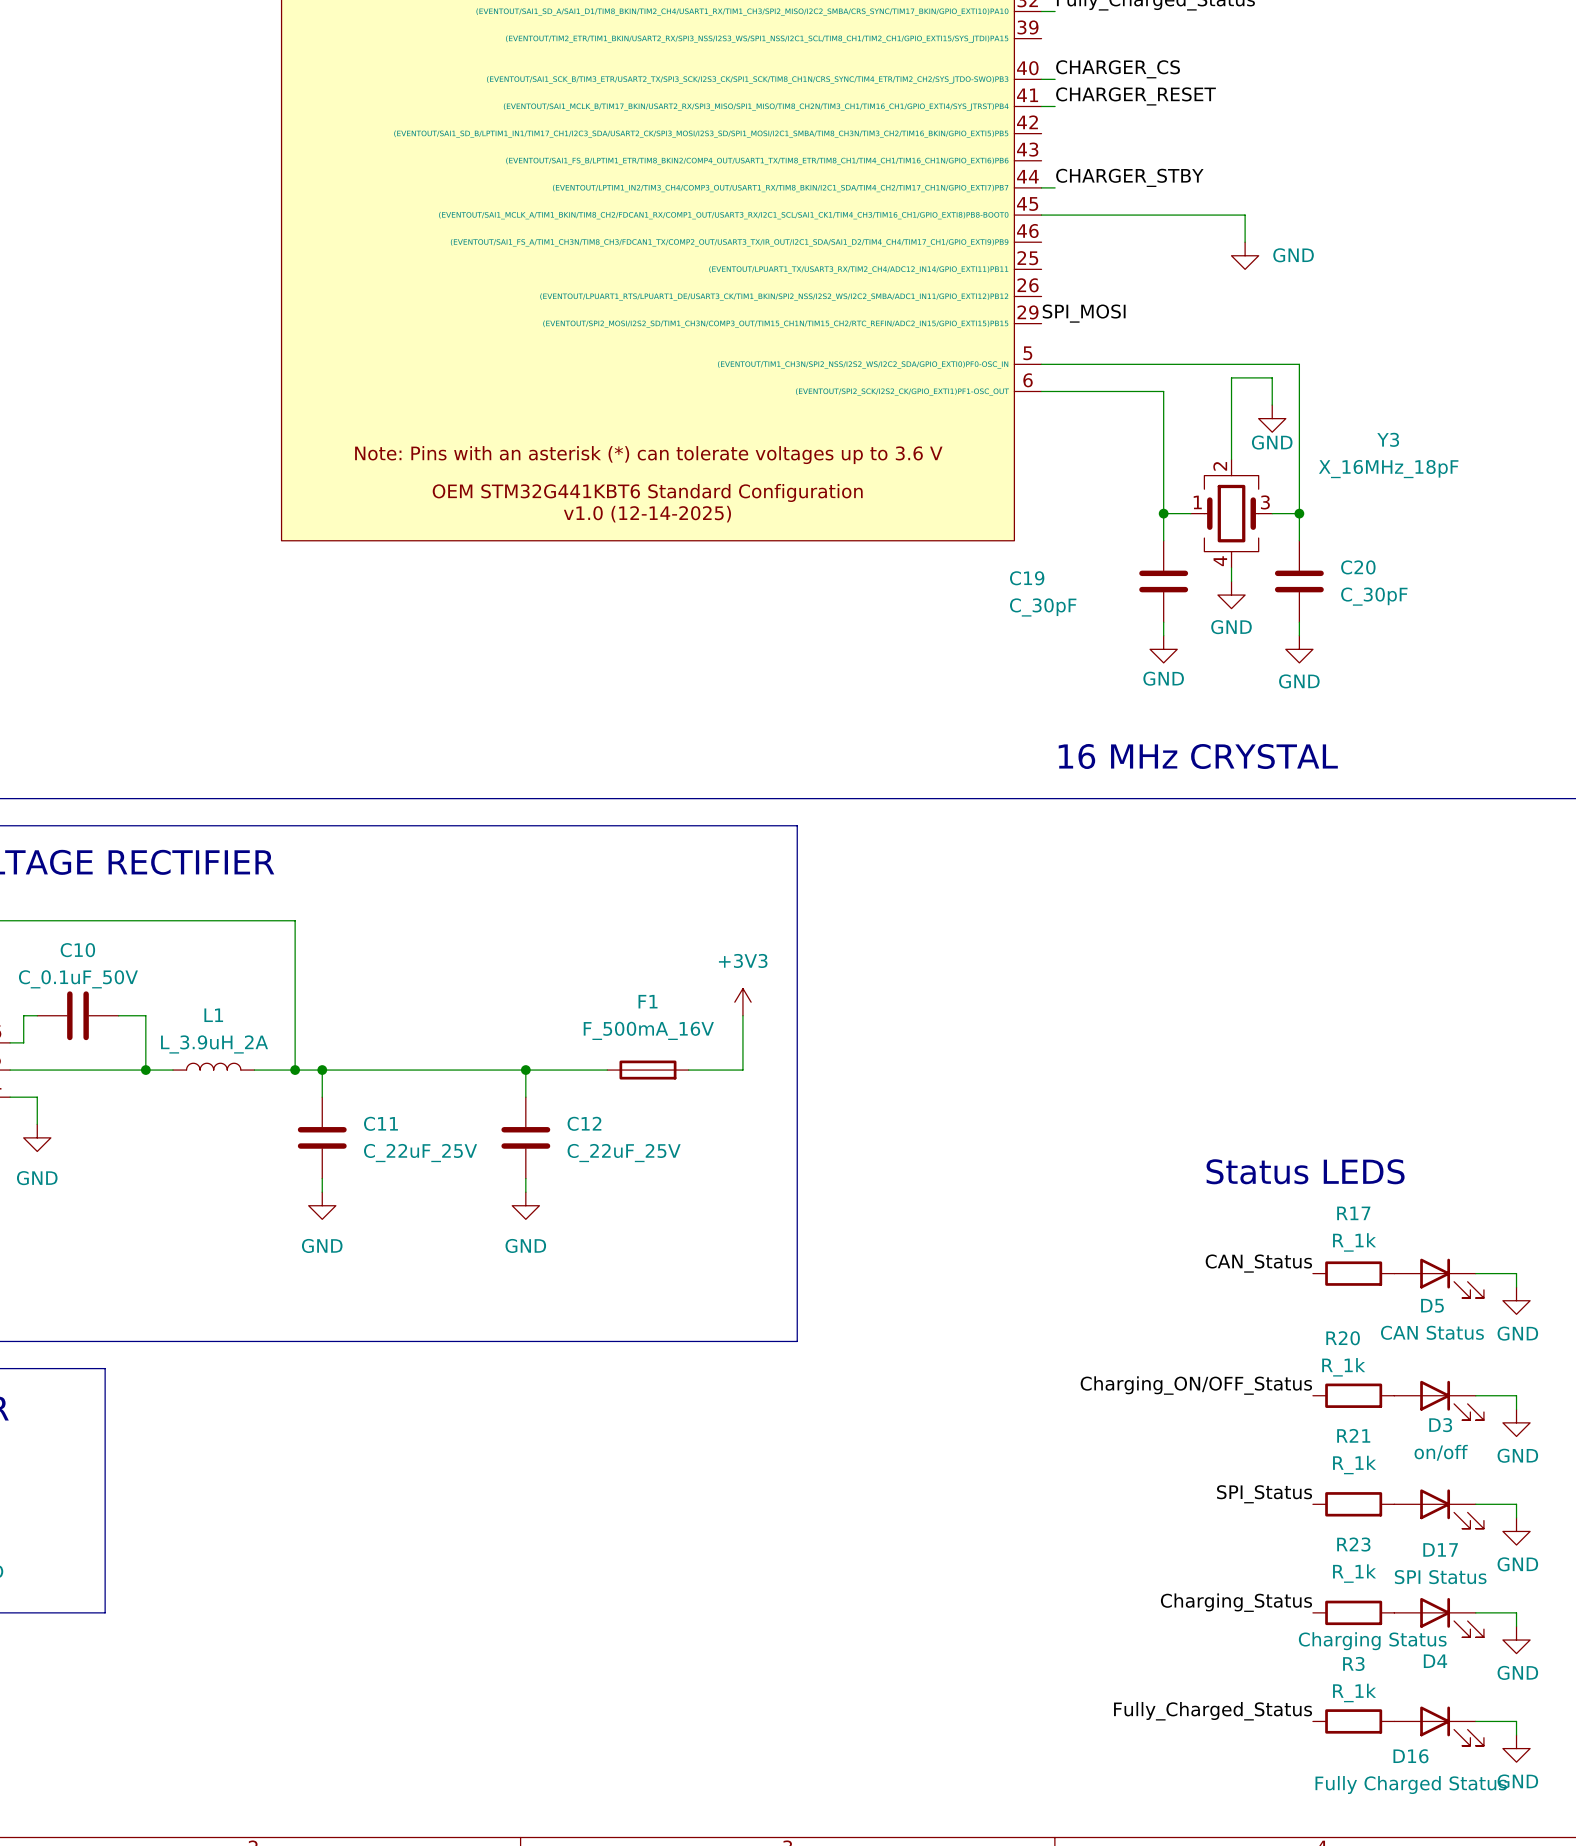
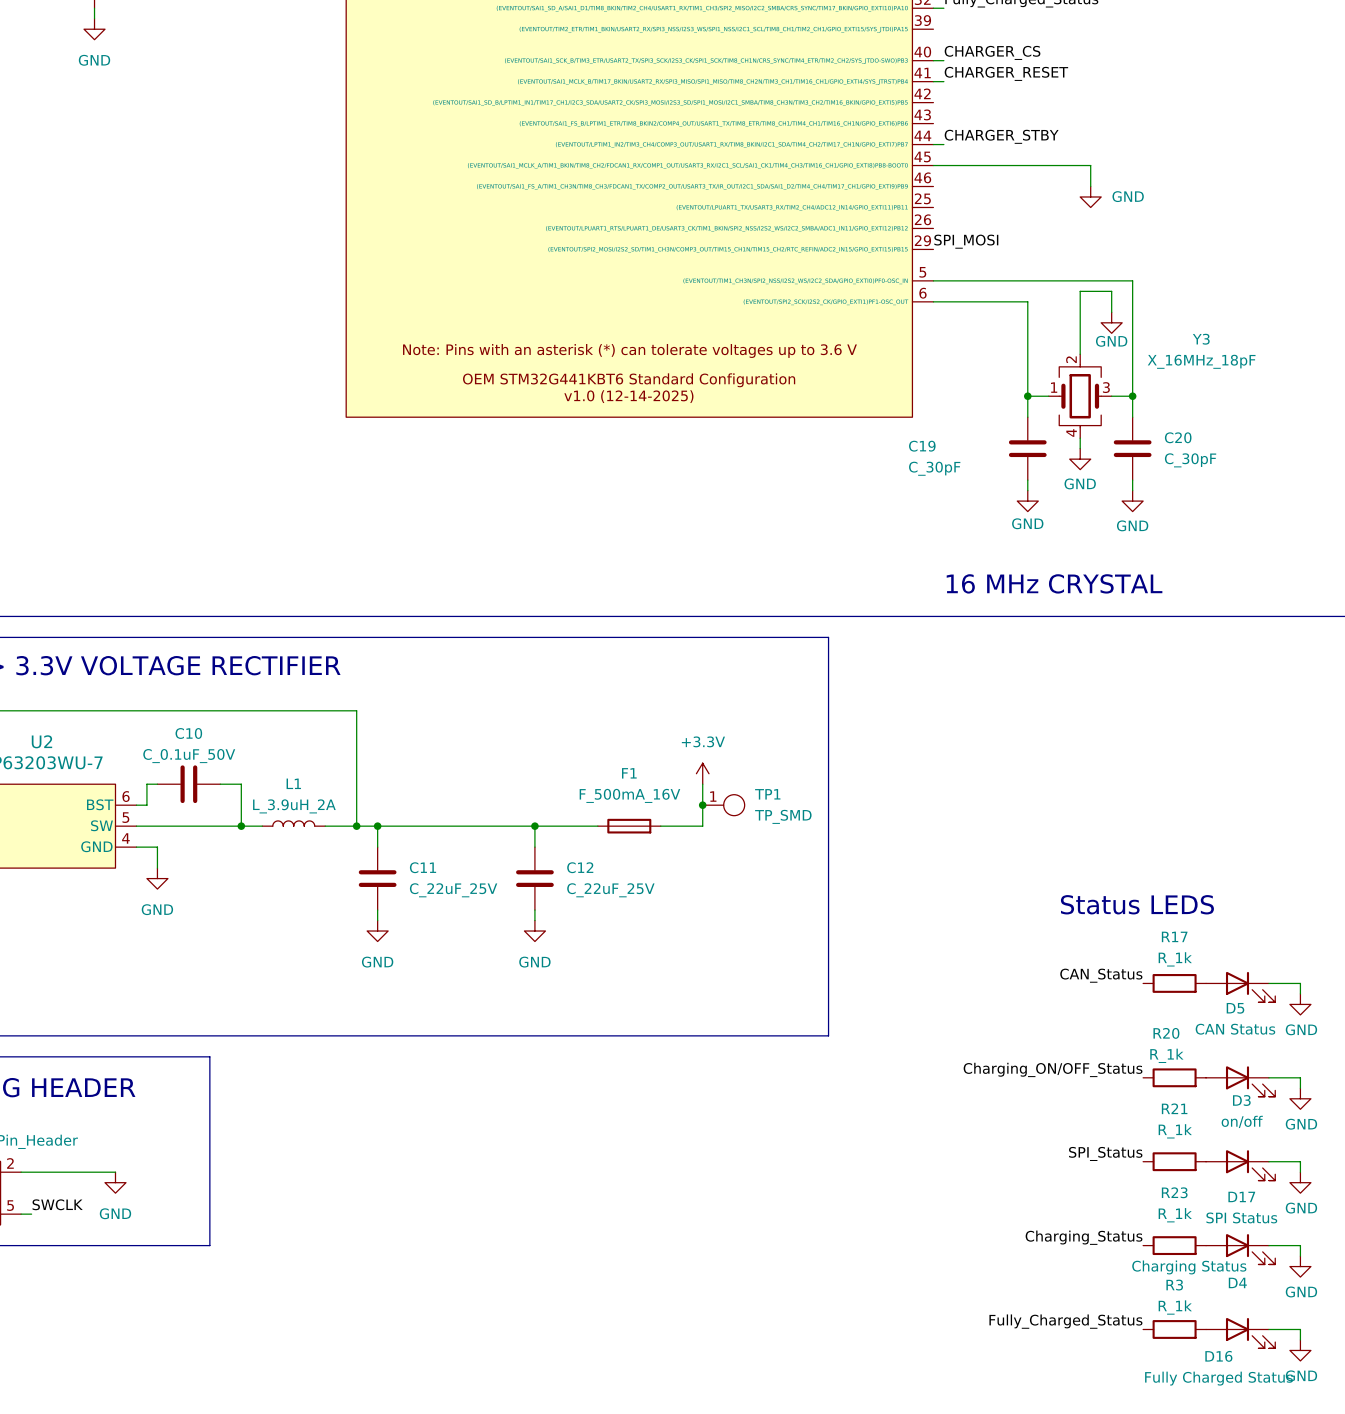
line: (797, 825) (797, 1341) -> (744, 637) (828, 637) (828, 1035) (744, 1035)
power symbol: +3V3 (742, 1002) -> +3.3V (702, 773)
junction: none -> (702, 805)
TP1: none -> TP_SMD (723, 805)

